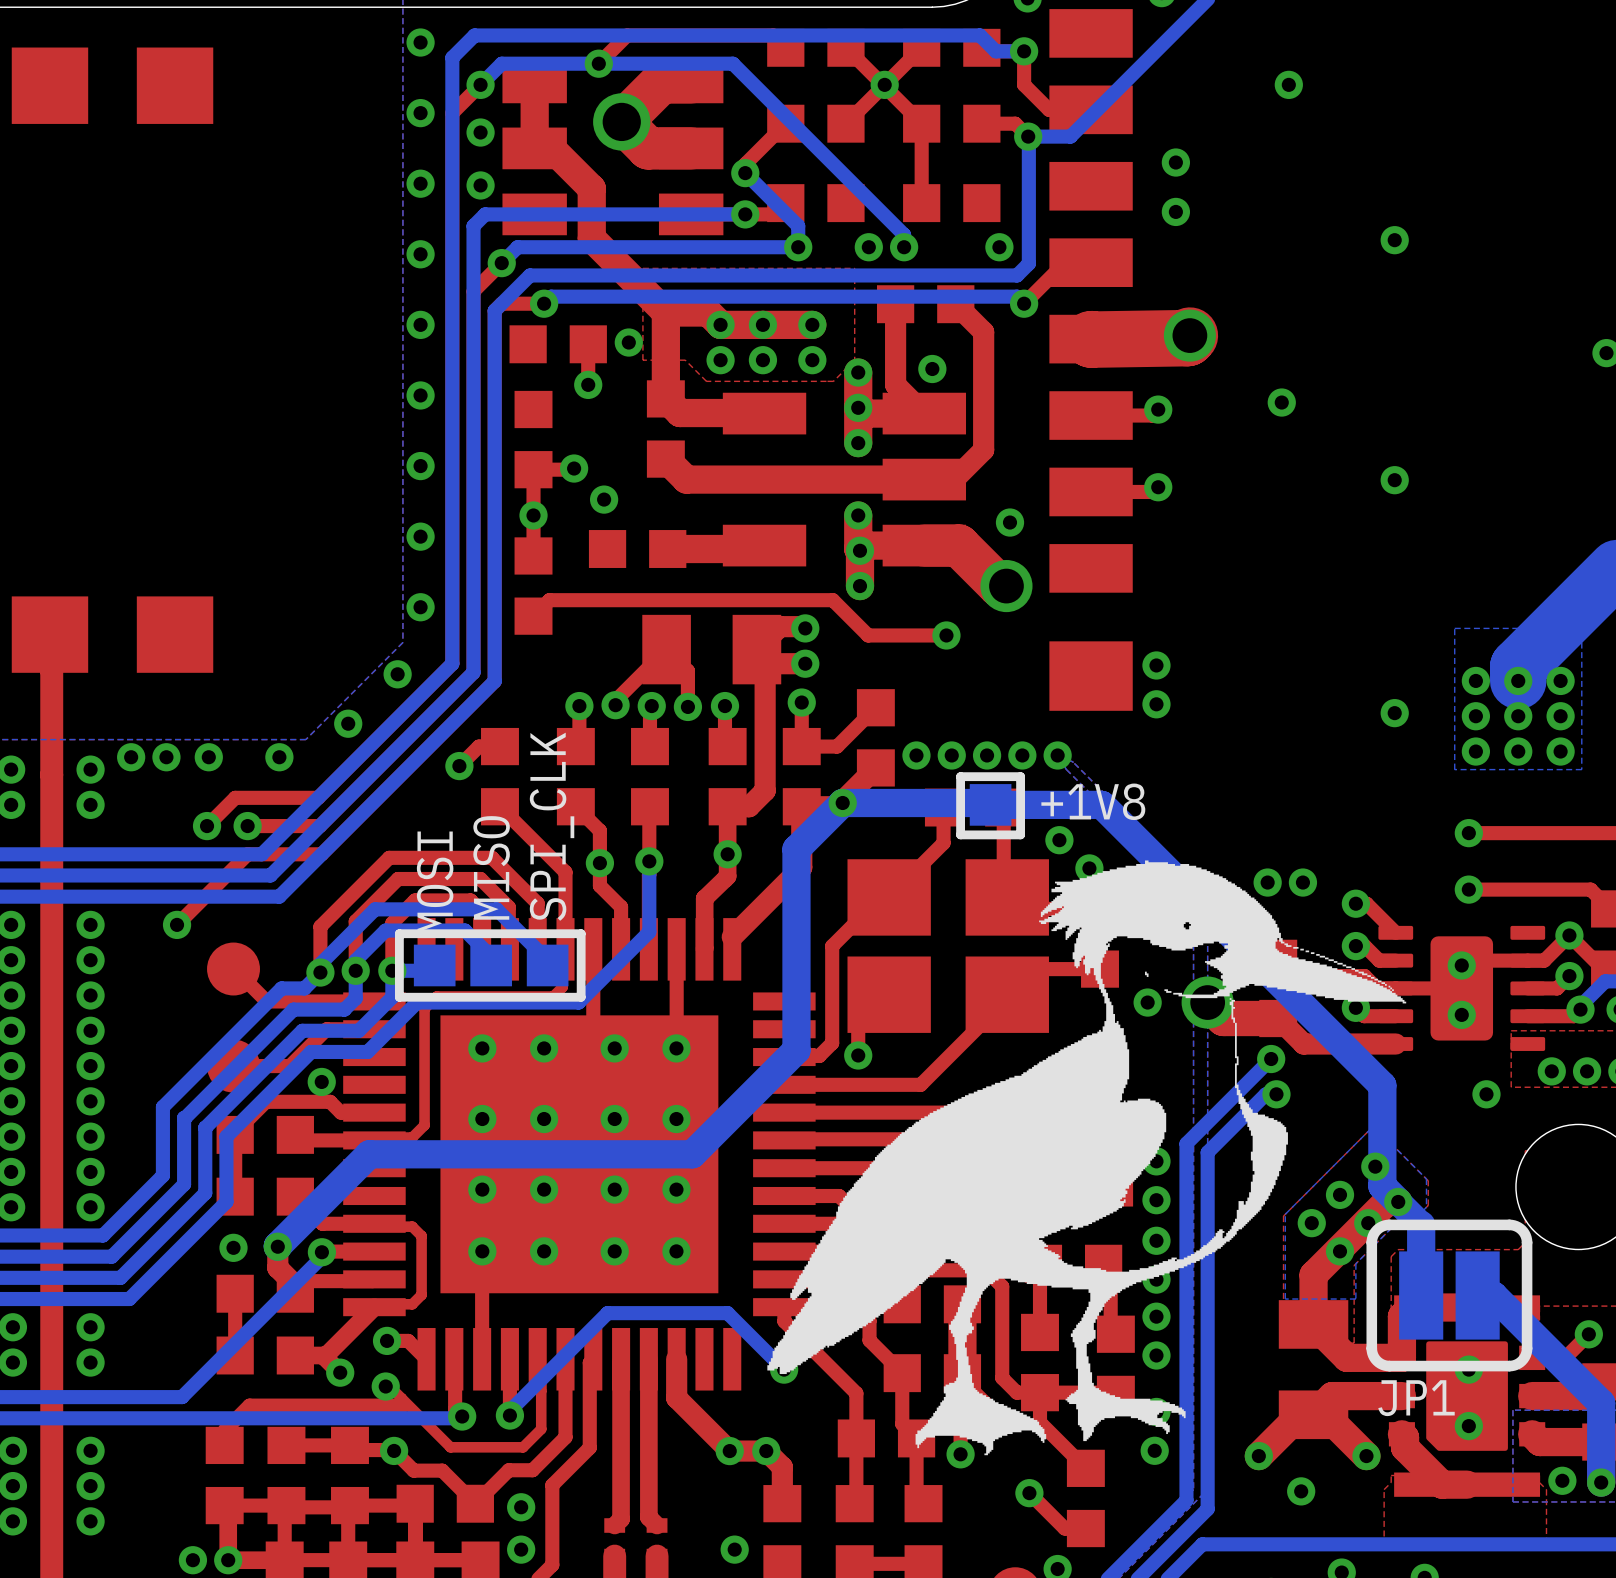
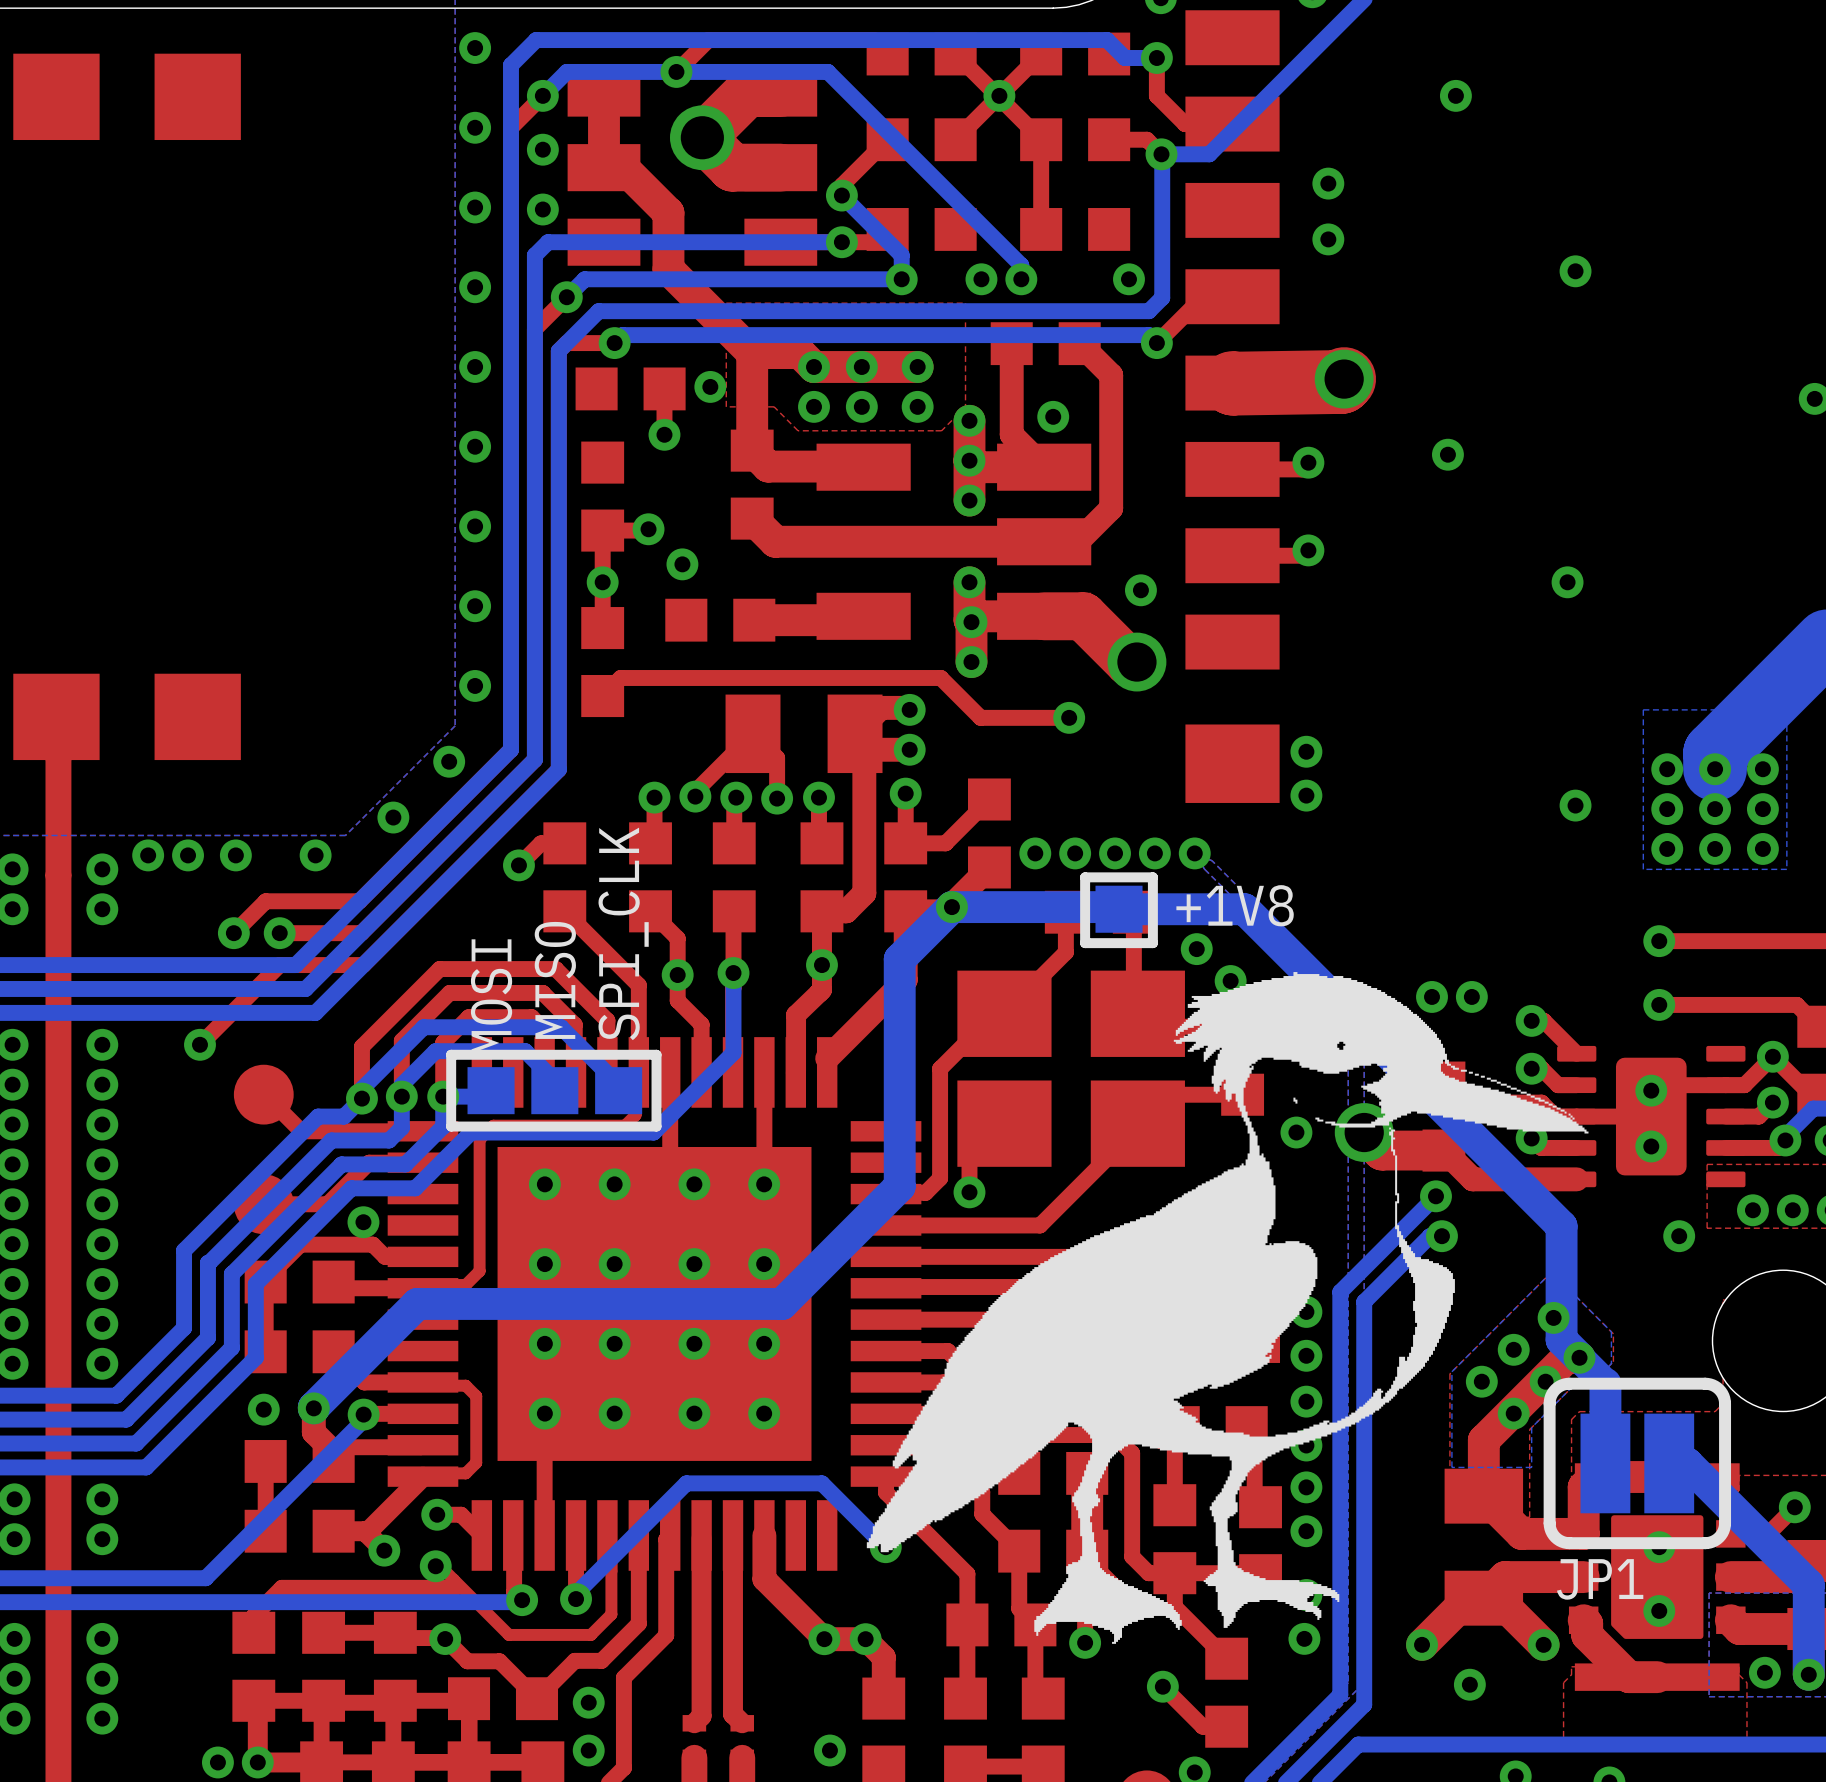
via position: (1394, 480) -> (1567, 582)

